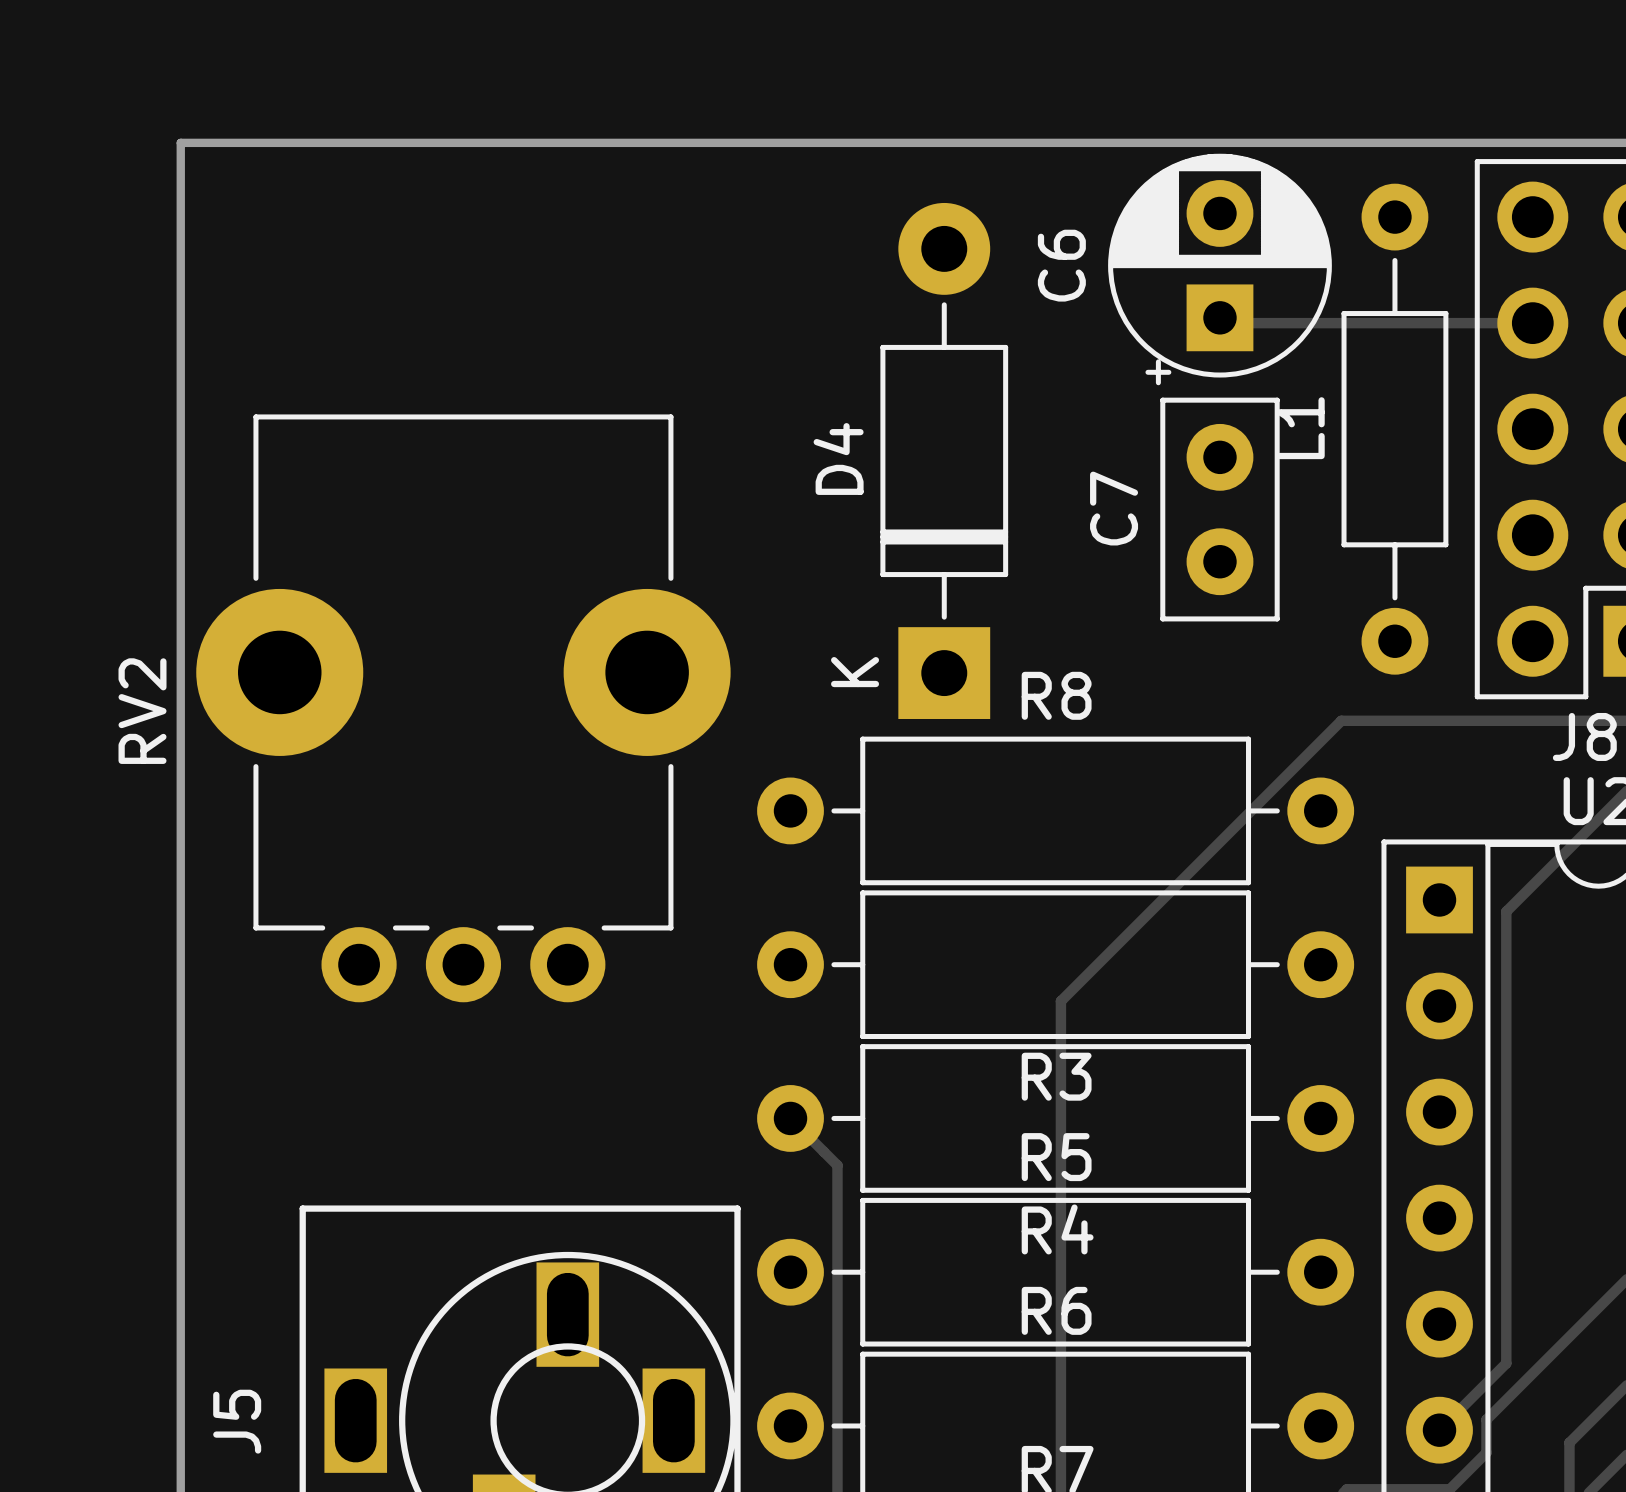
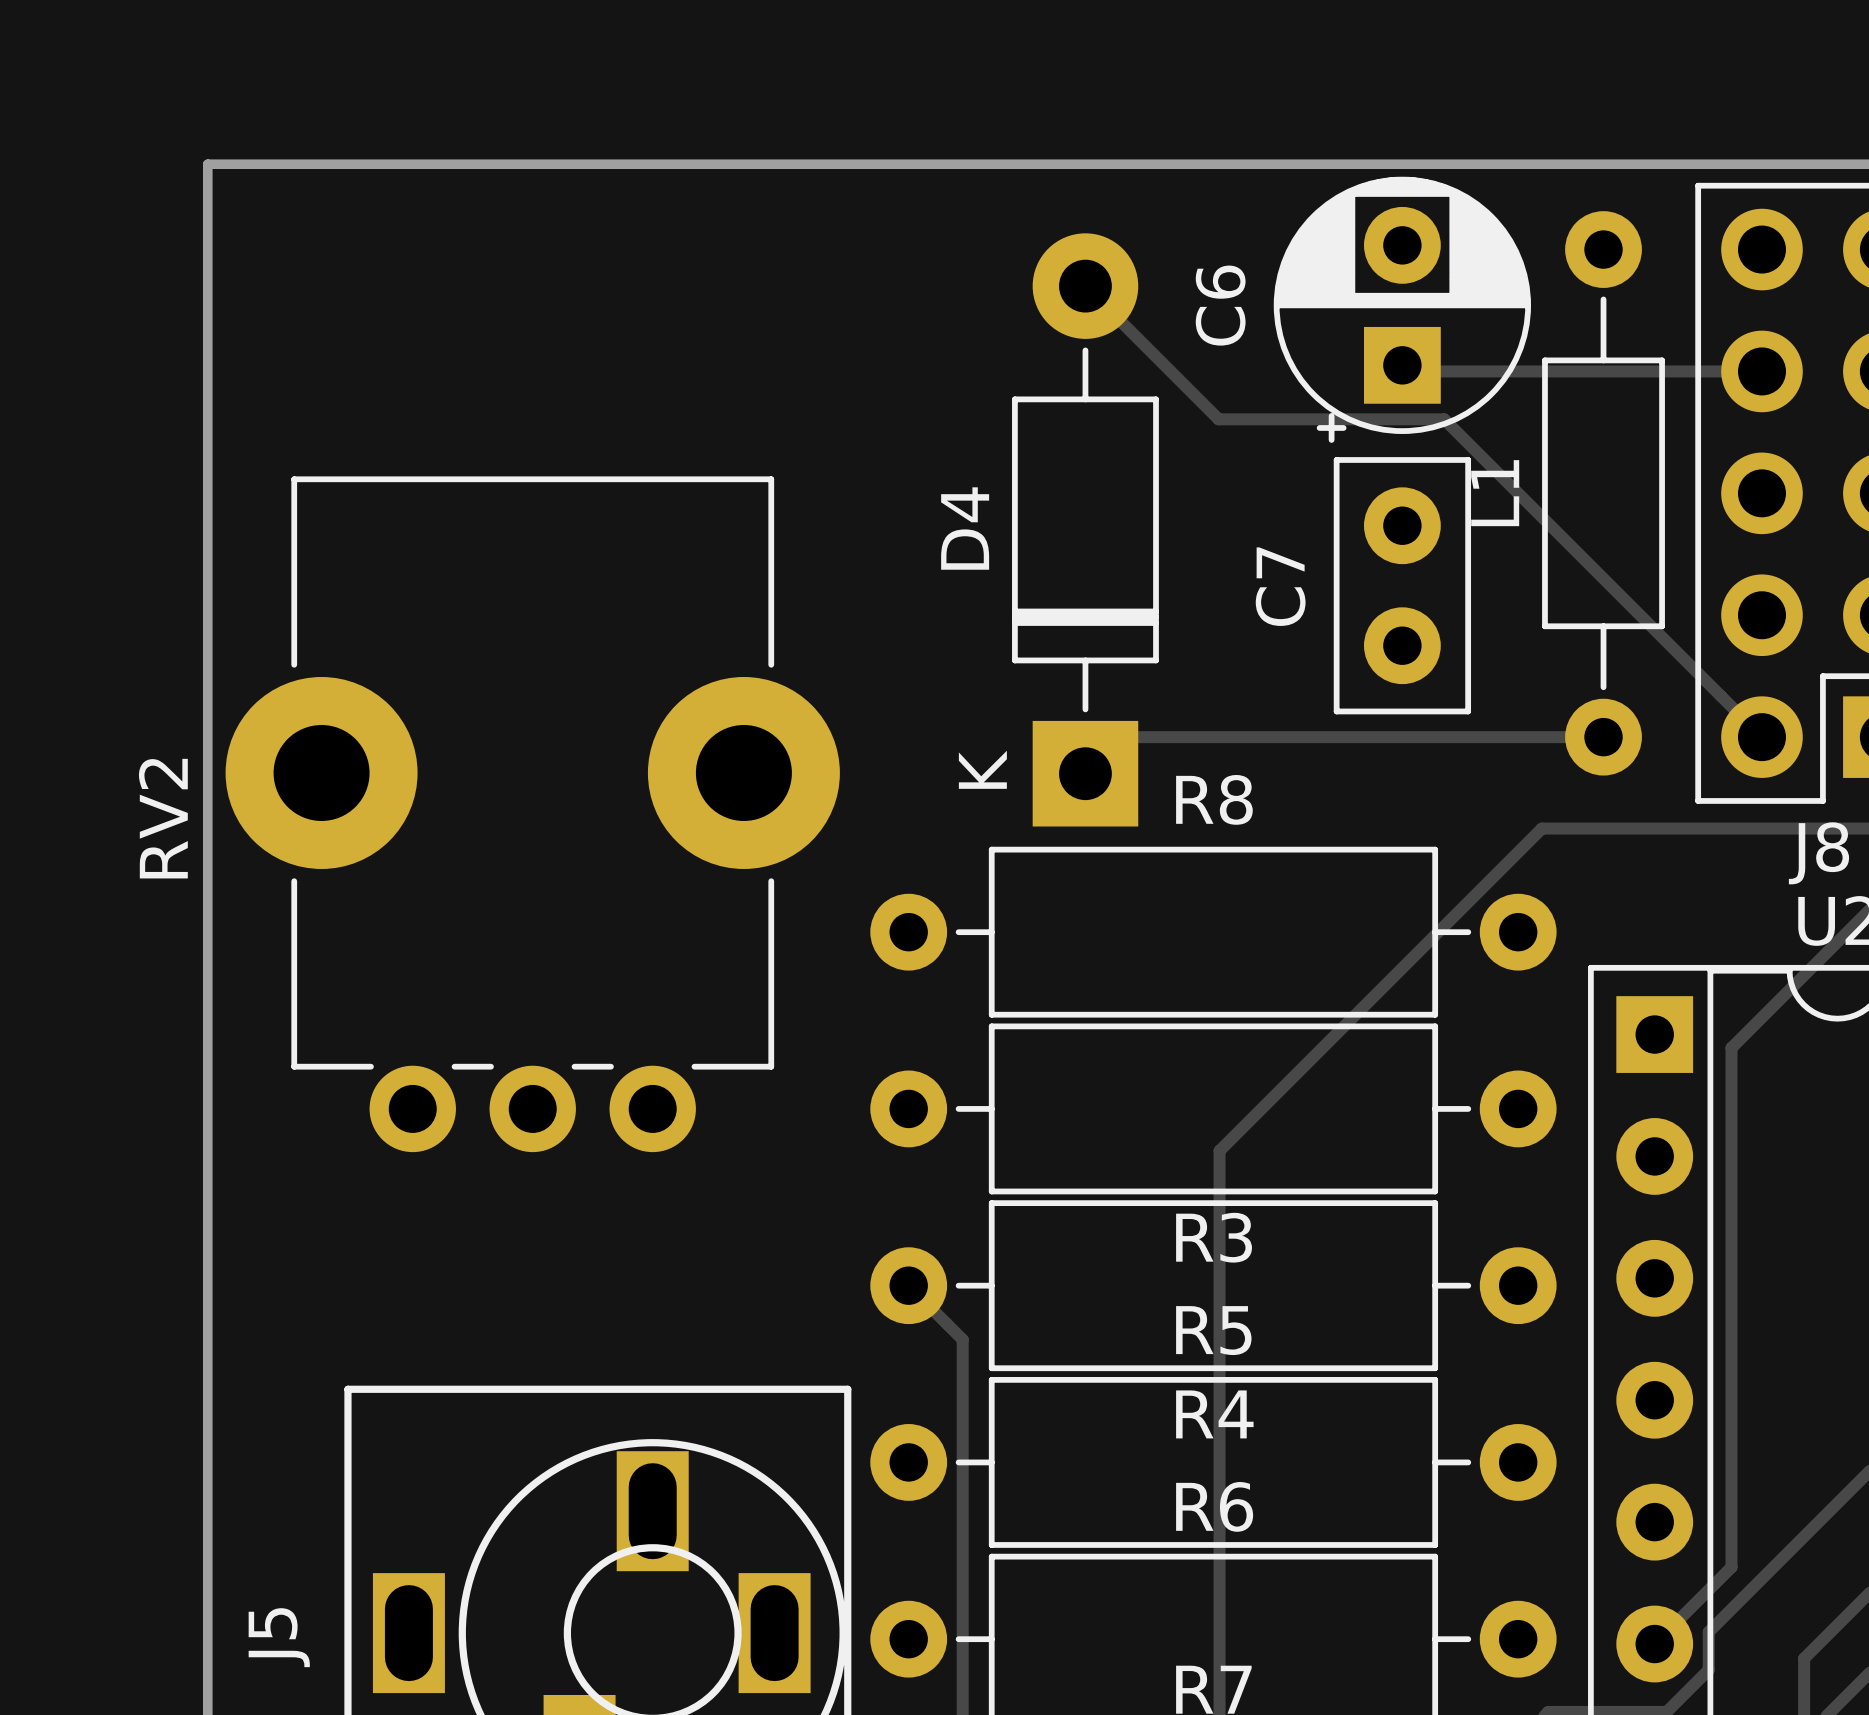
track: none -> (1085, 286) (1218, 419) (1444, 419) (1761, 737)
track: none -> (1603, 737) (1122, 737) (1085, 773)

